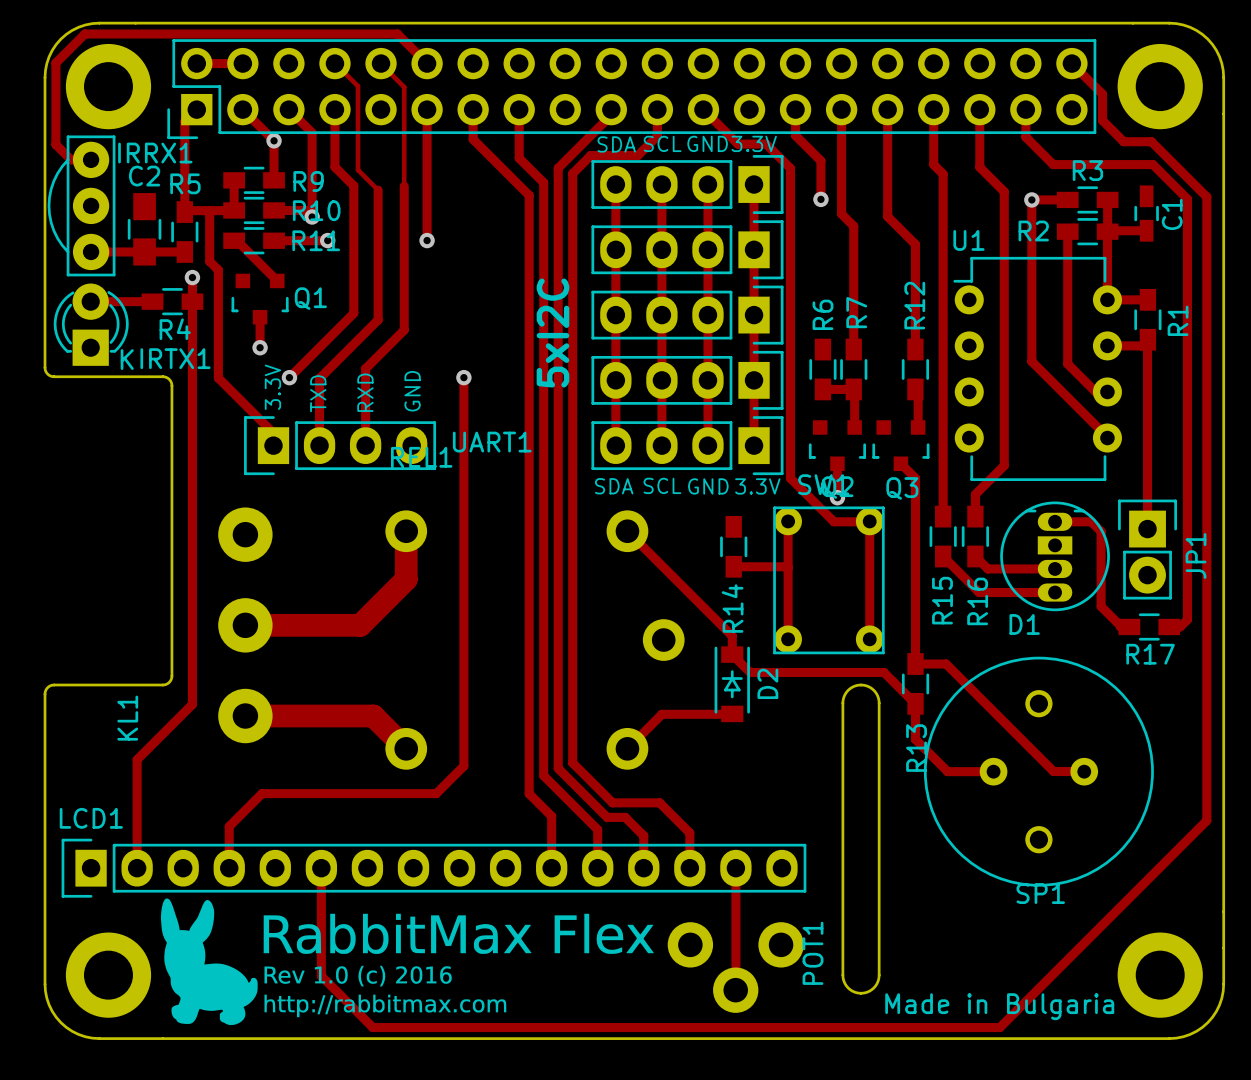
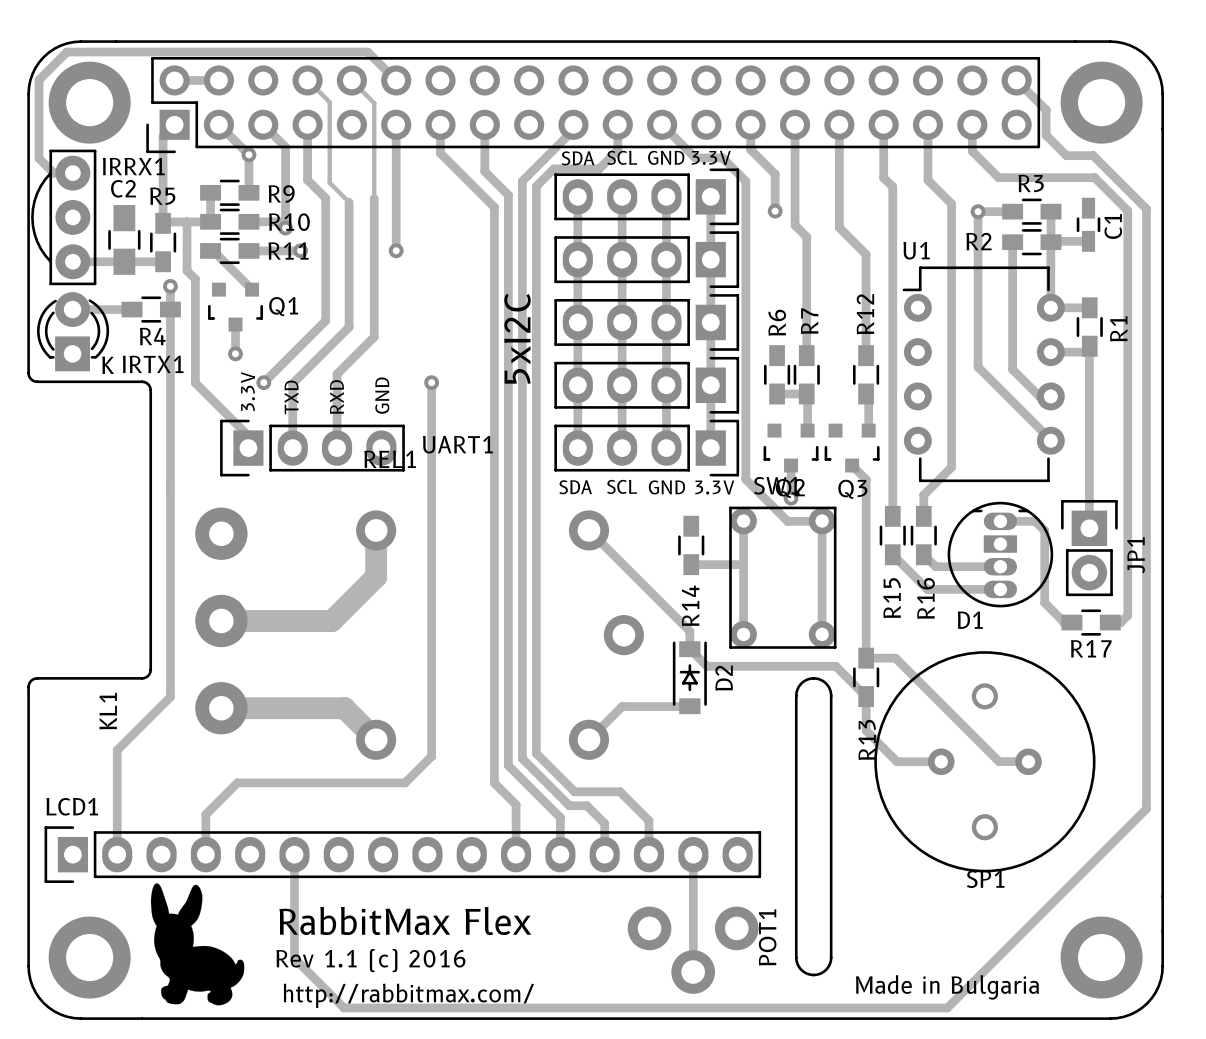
drawing: [160, 898, 655, 1026] -> none
drawing: none -> [150, 883, 245, 1006]
text: none -> RabbitMax Flex (405, 920)
text: none -> Rev 1.1 (c) 2016 (370, 960)
text: none -> http://rabbitmax.com/ (408, 995)

